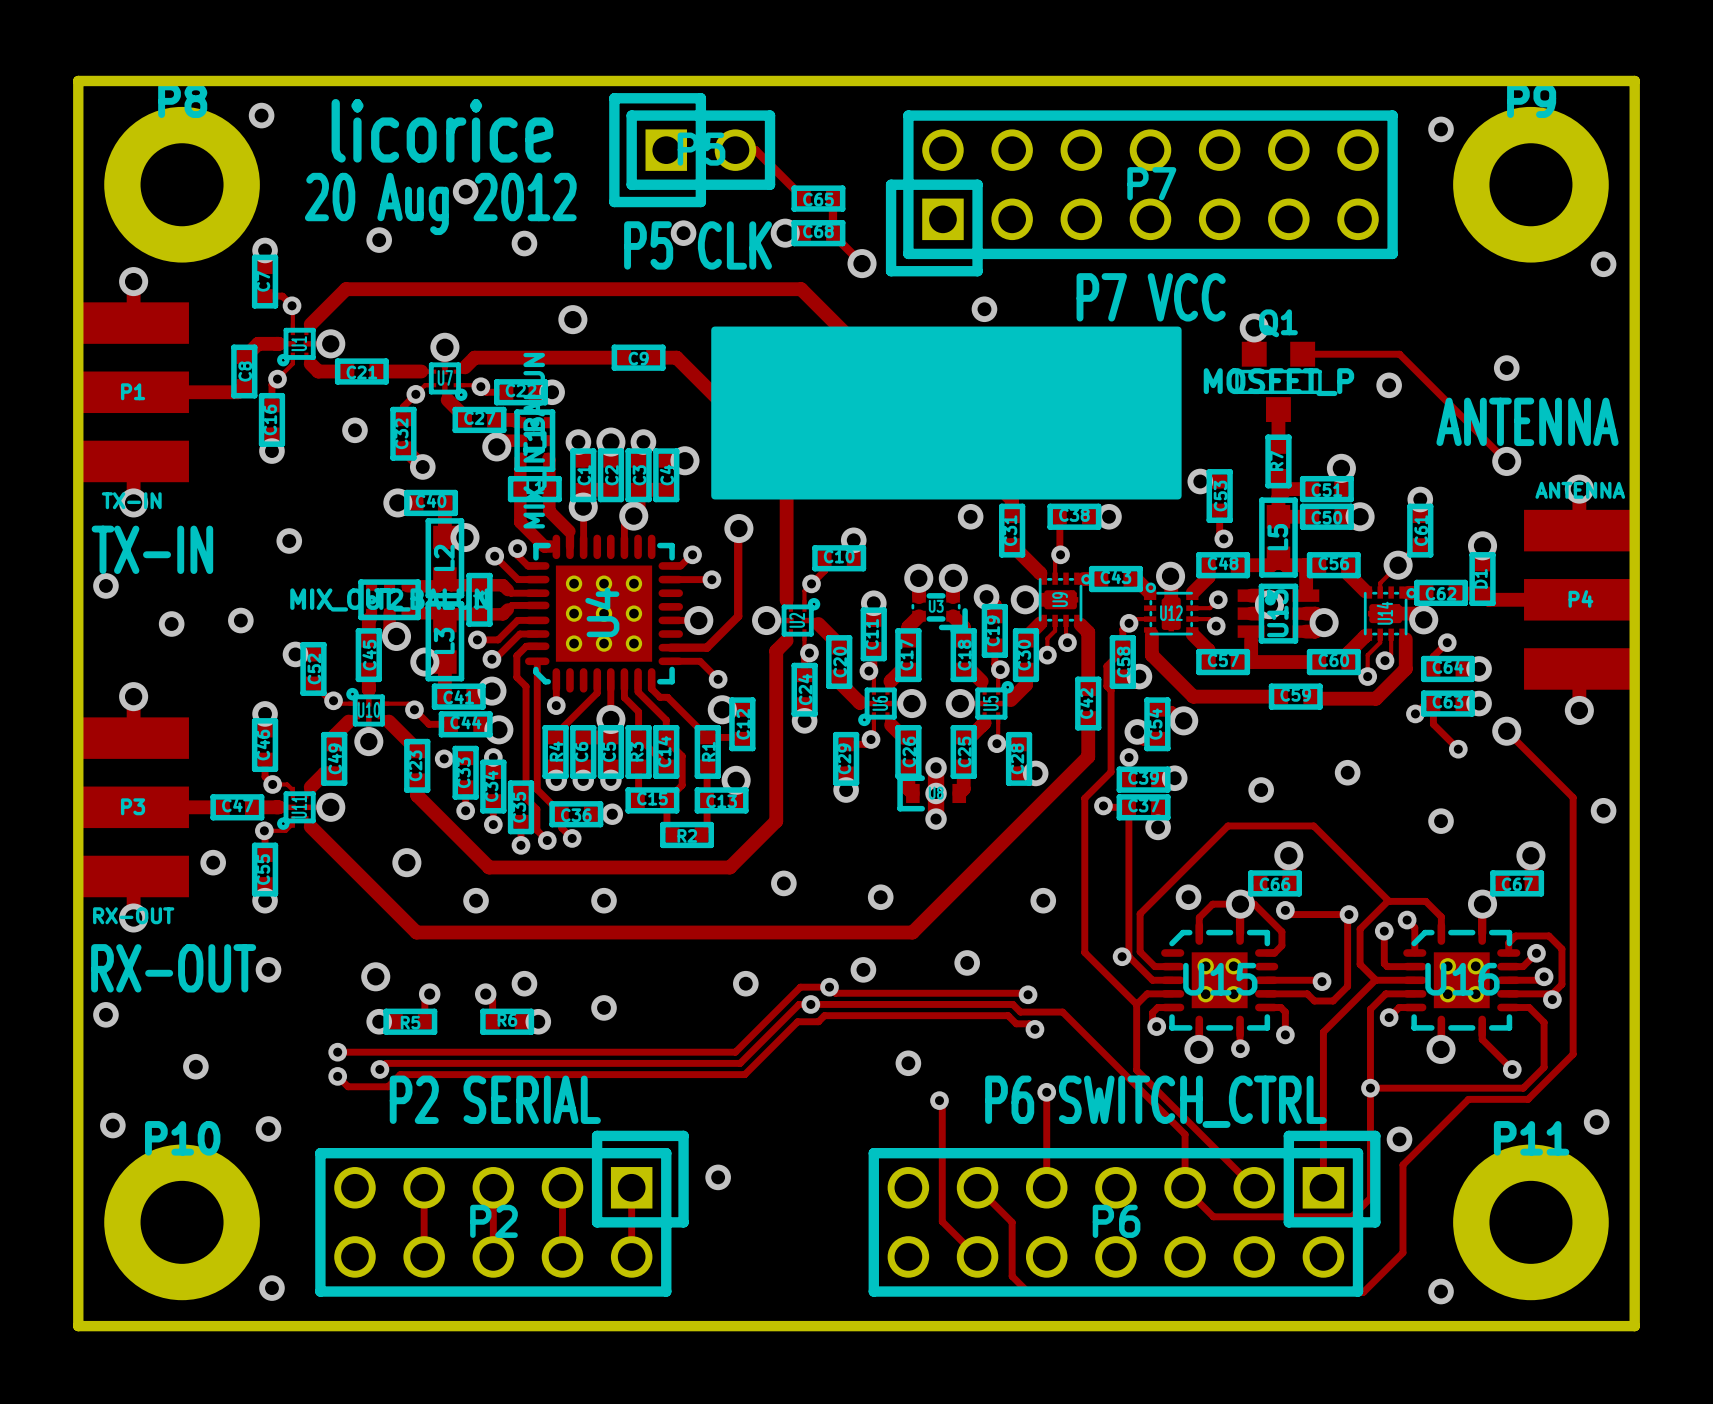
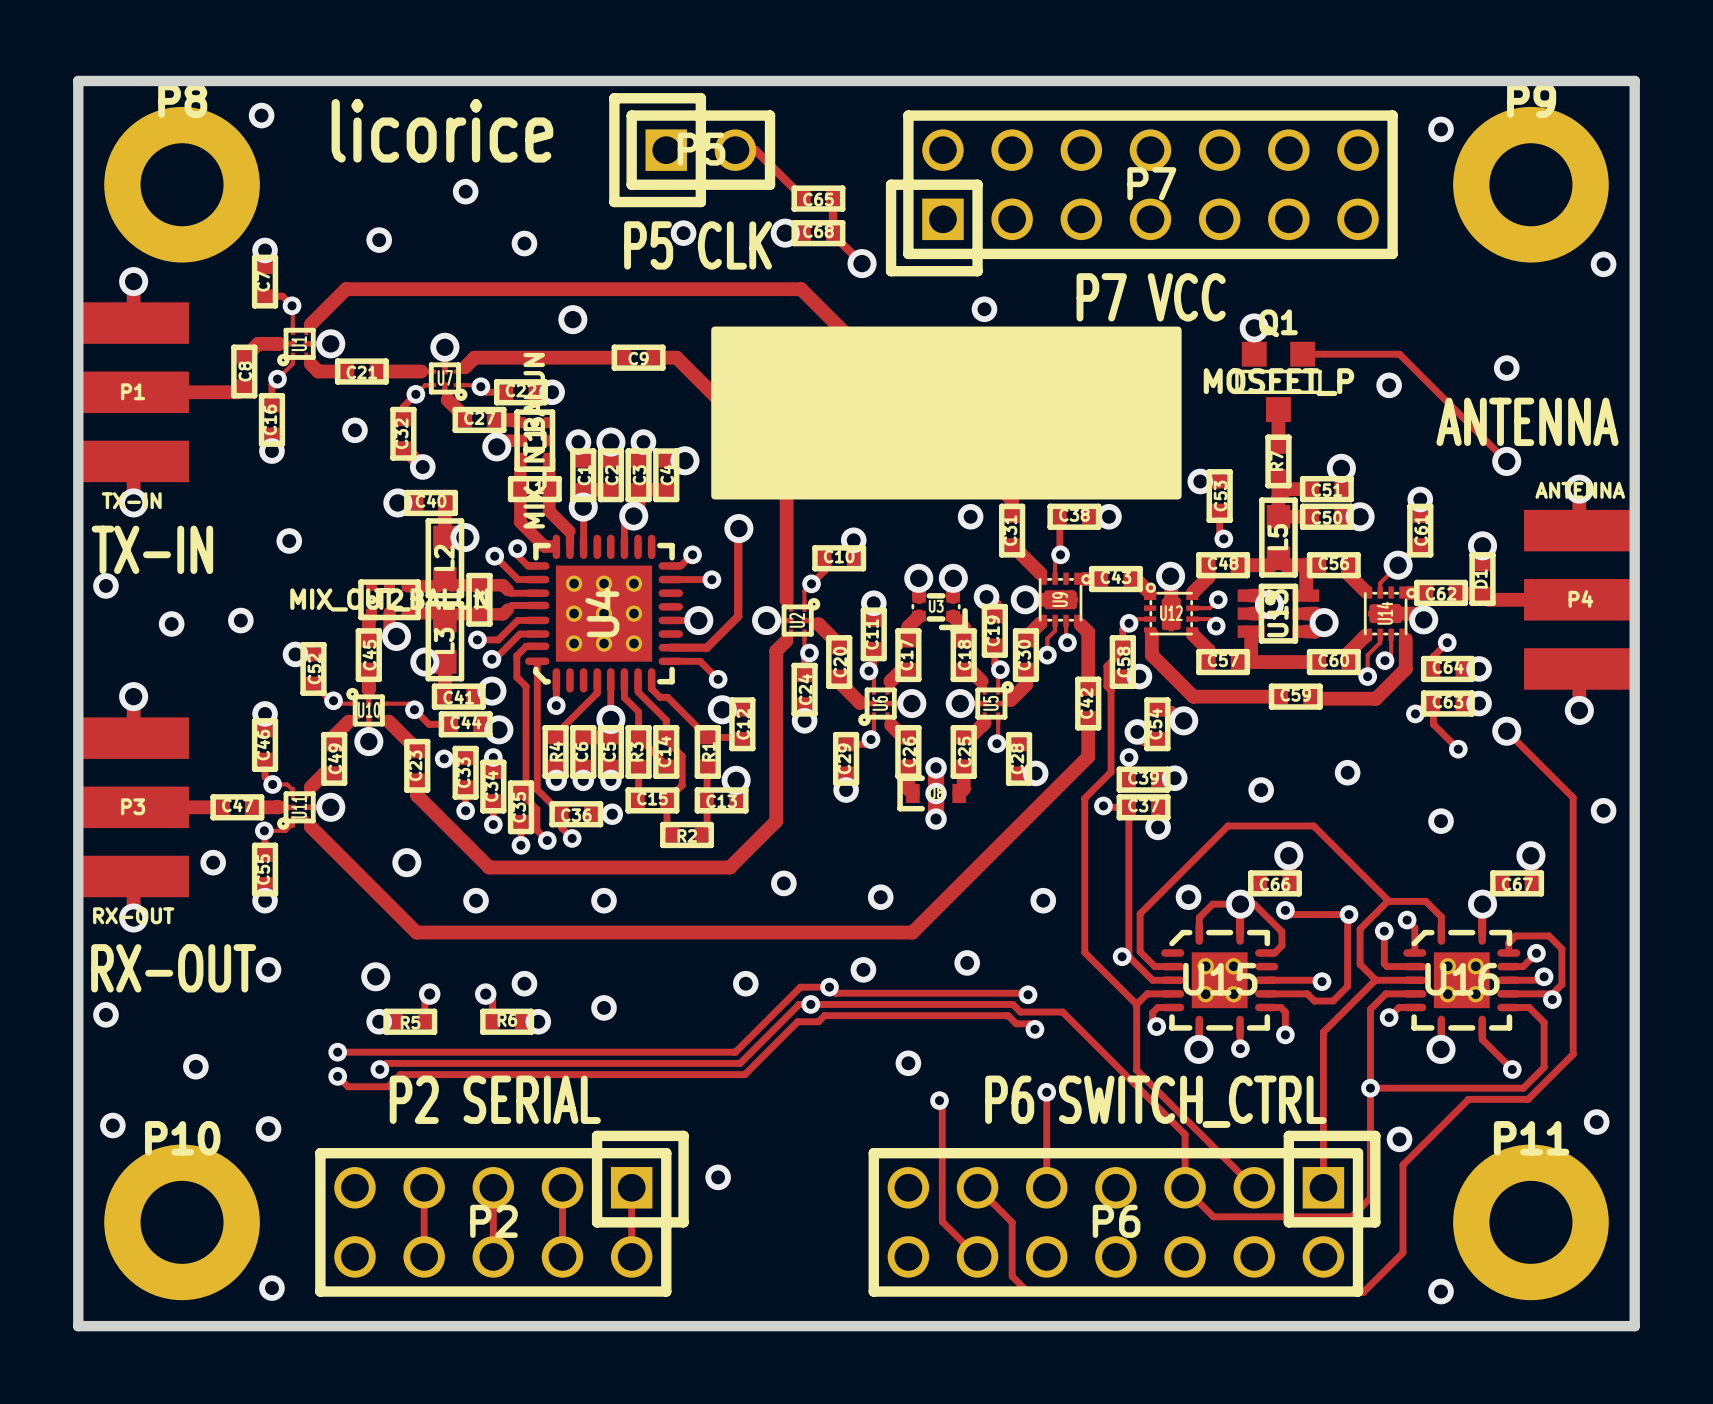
text: 20 Aug 2012 (440, 203) -> none

